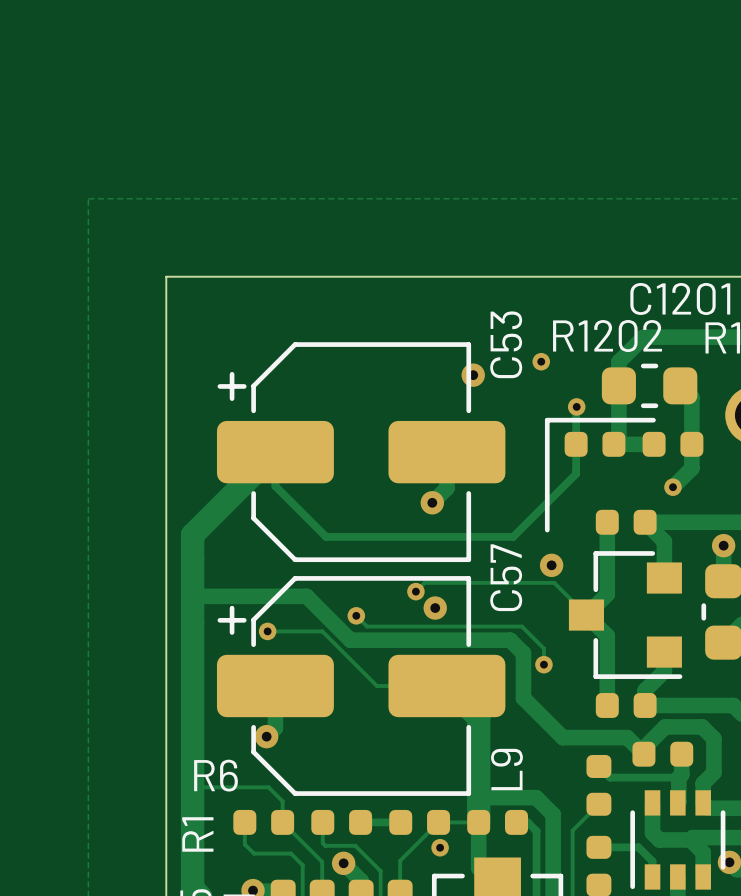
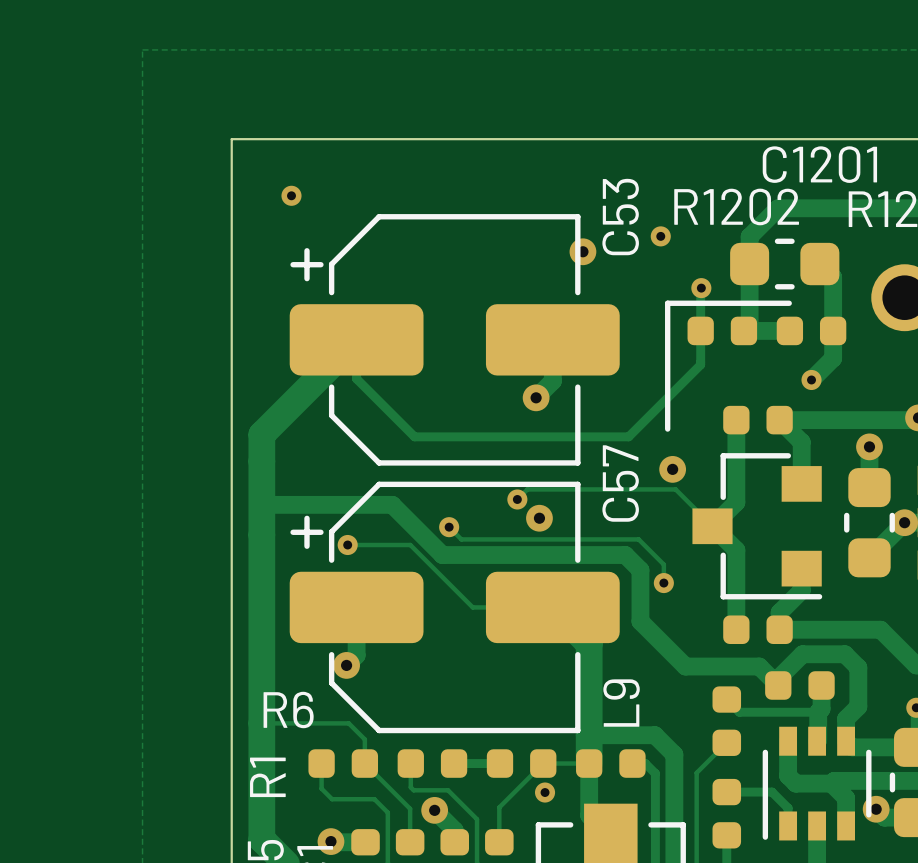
via: none -> (291, 195)

